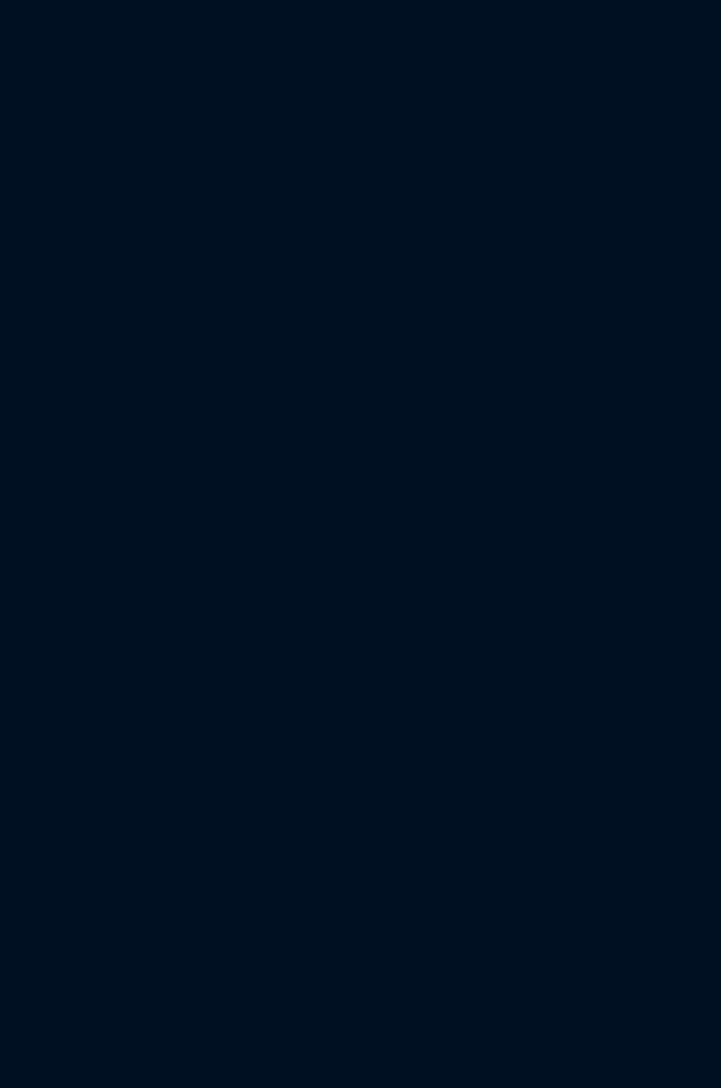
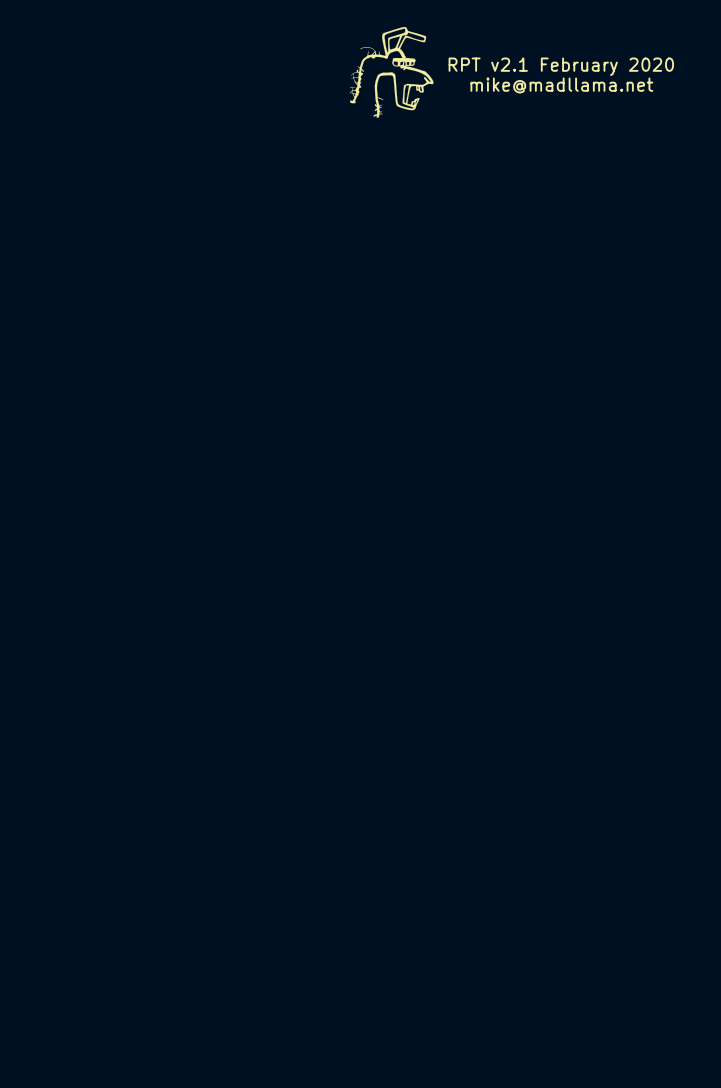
drawing: none -> [350, 26, 434, 118]
text: none -> RPT v2.1 February 2020 (561, 66)
text: none -> mike@madllama.net (561, 85)

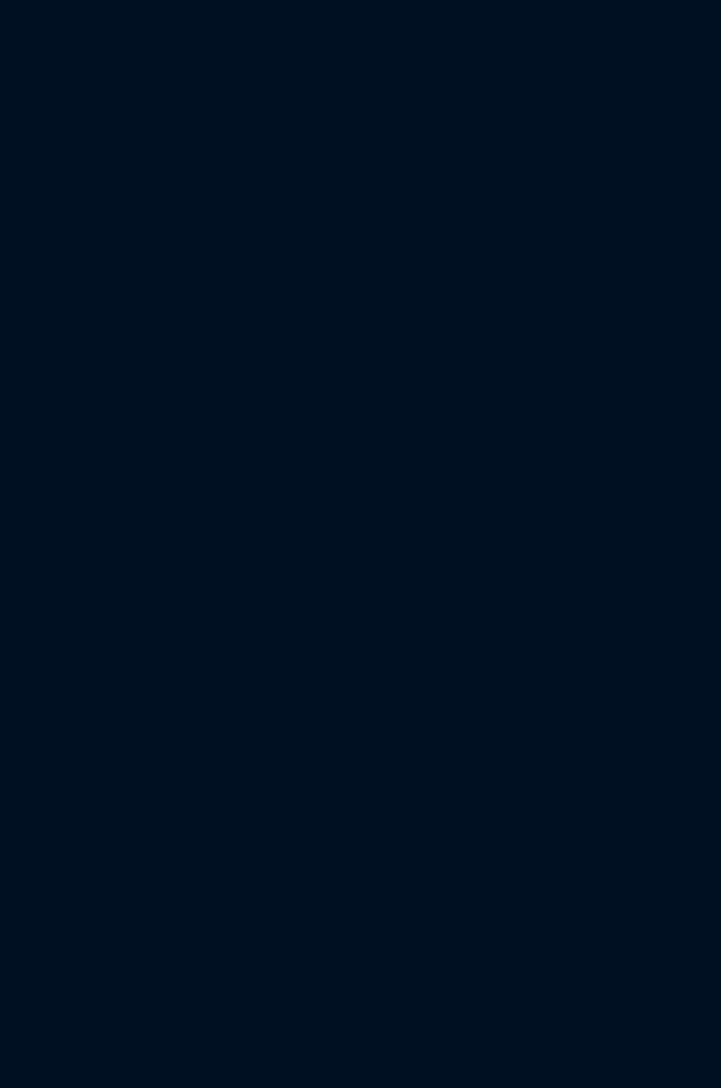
drawing: [350, 26, 434, 118] -> none
text: RPT v2.1 February 2020 (561, 66) -> none
text: mike@madllama.net (561, 85) -> none

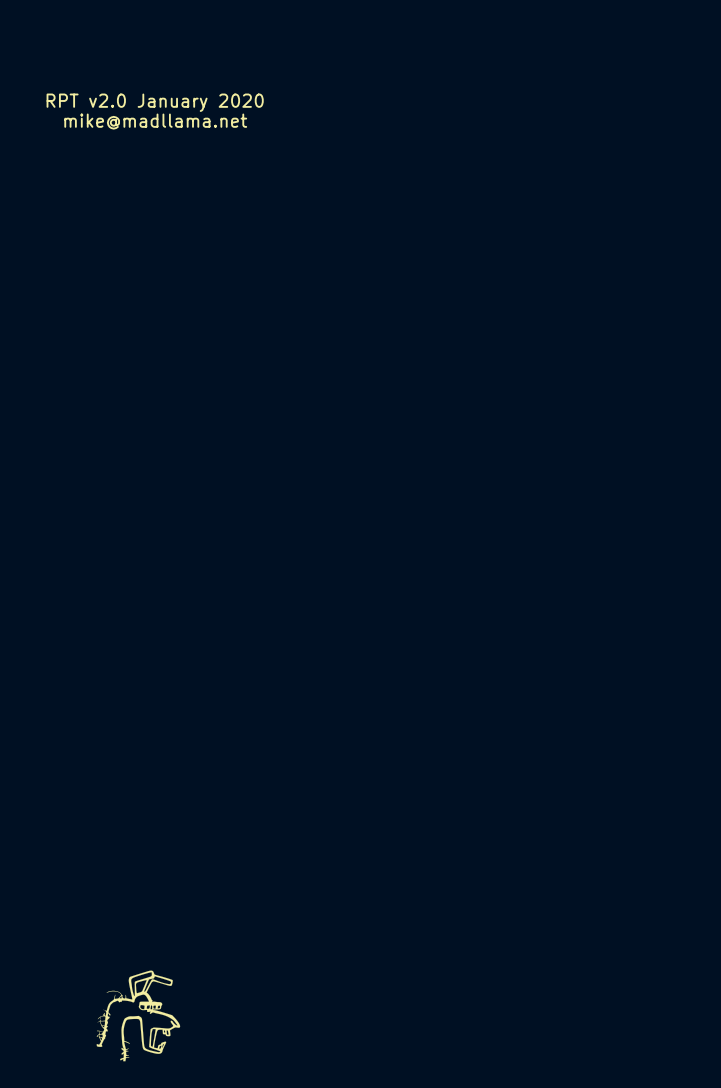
text: none -> RPT v2.0 January 2020 (155, 102)
text: none -> mike@madllama.net (155, 121)
drawing: none -> [96, 970, 181, 1062]

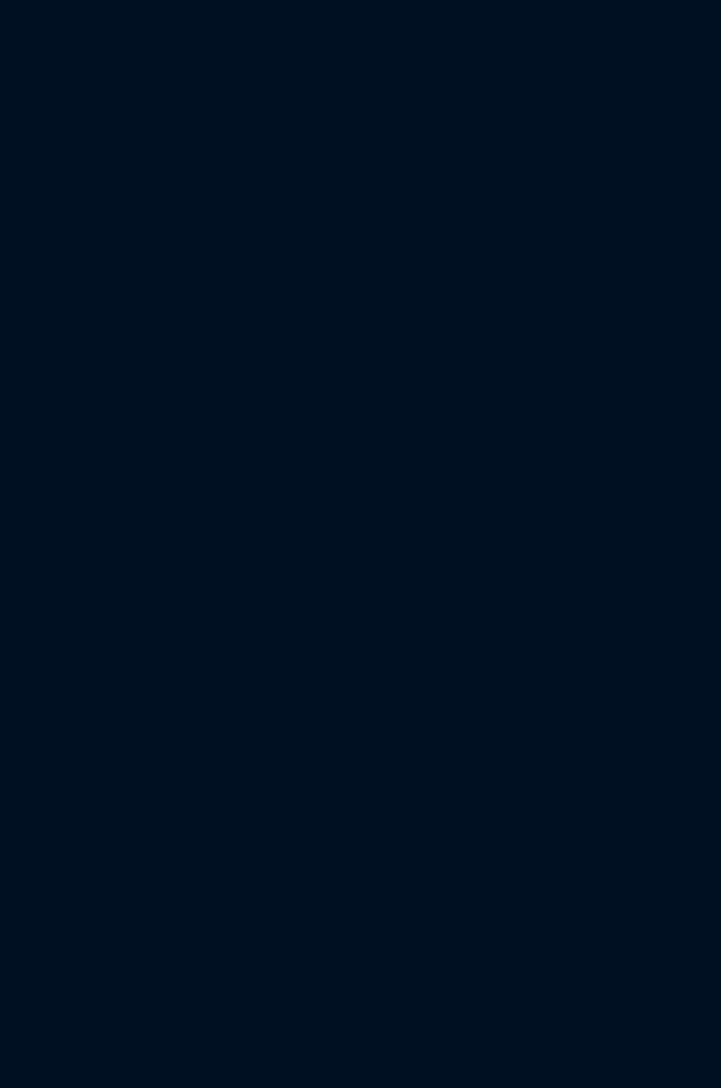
text: RPT v2.0 January 2020 (155, 102) -> none
text: mike@madllama.net (155, 121) -> none
drawing: [96, 970, 181, 1062] -> none

